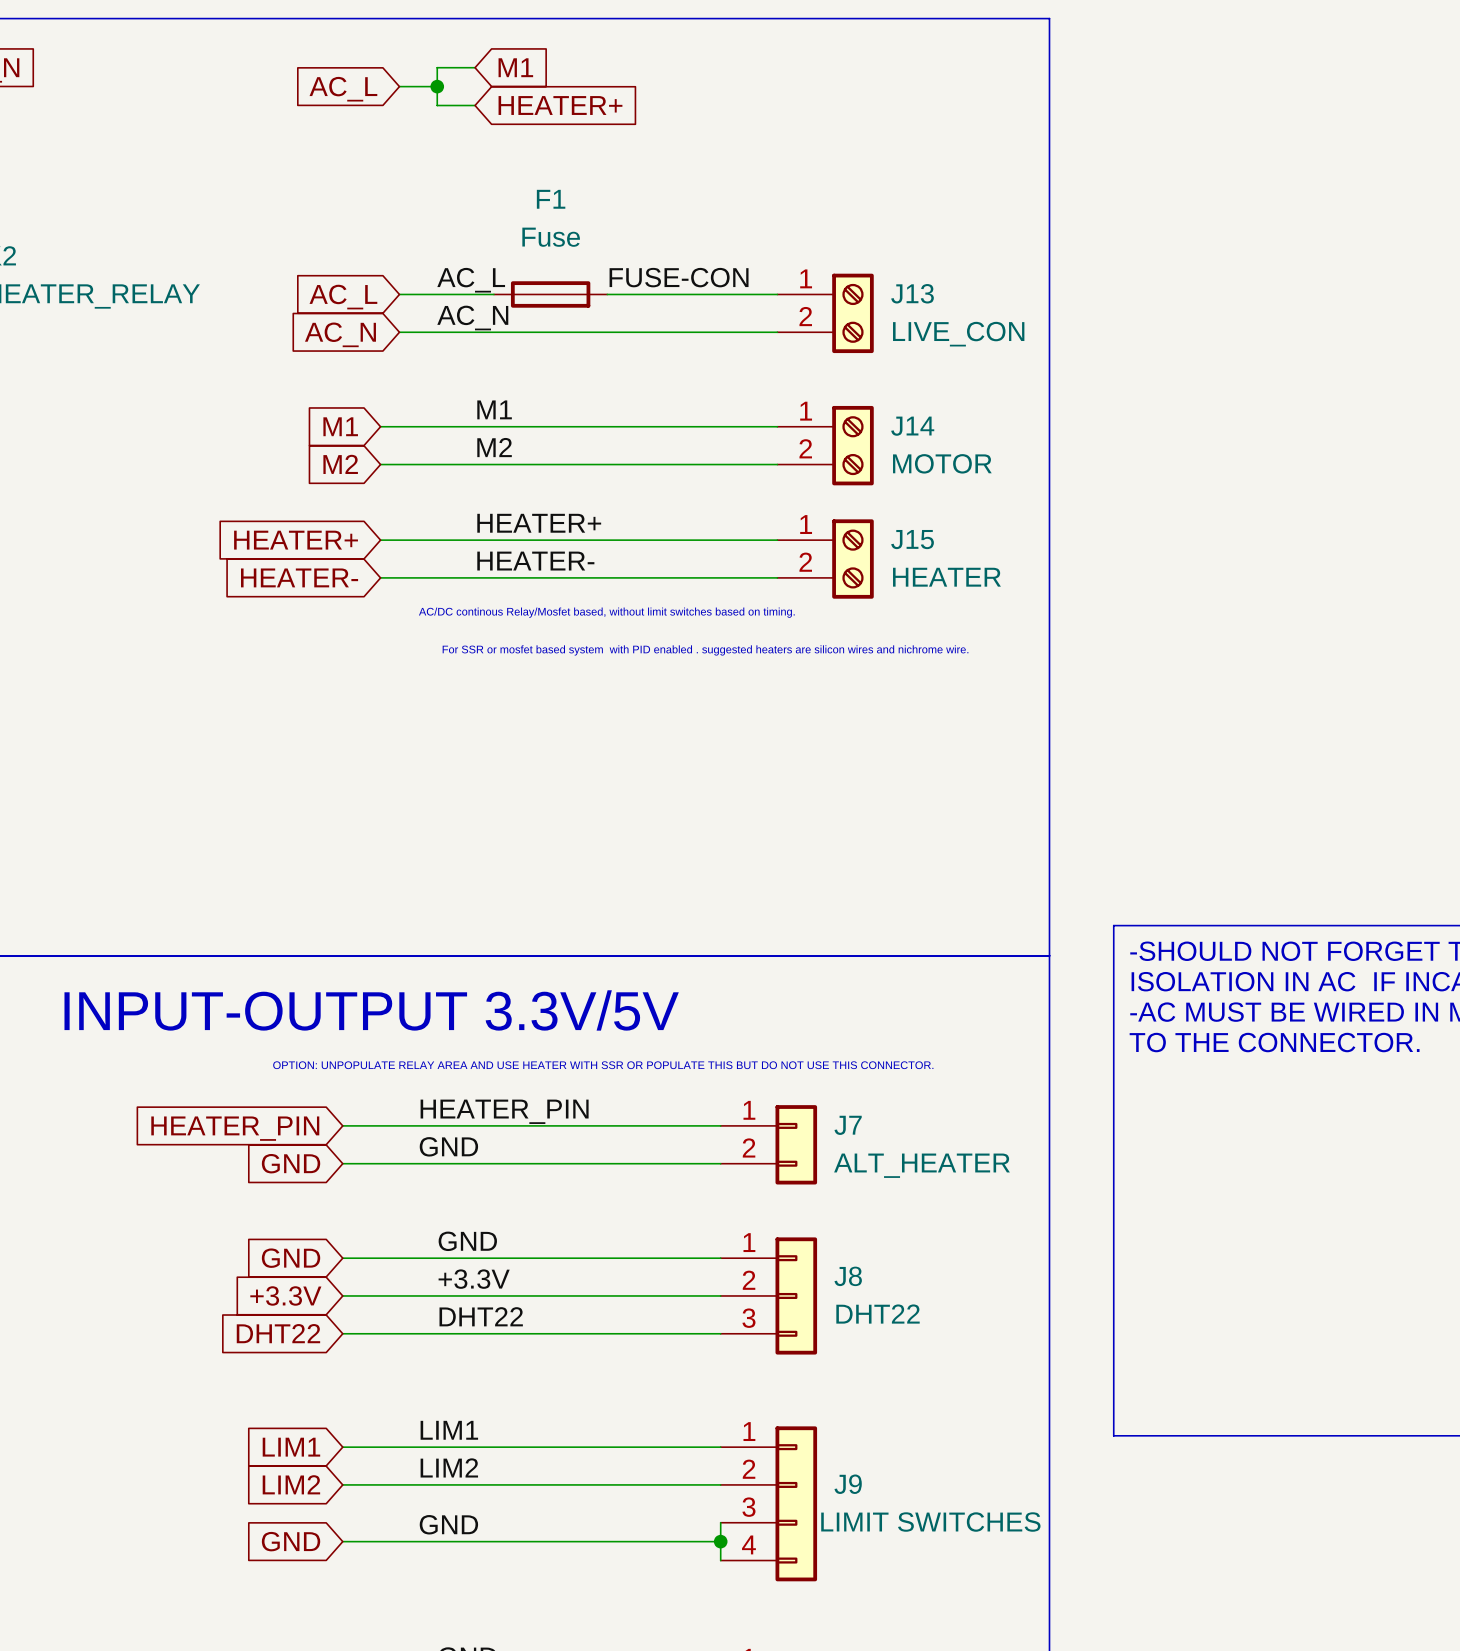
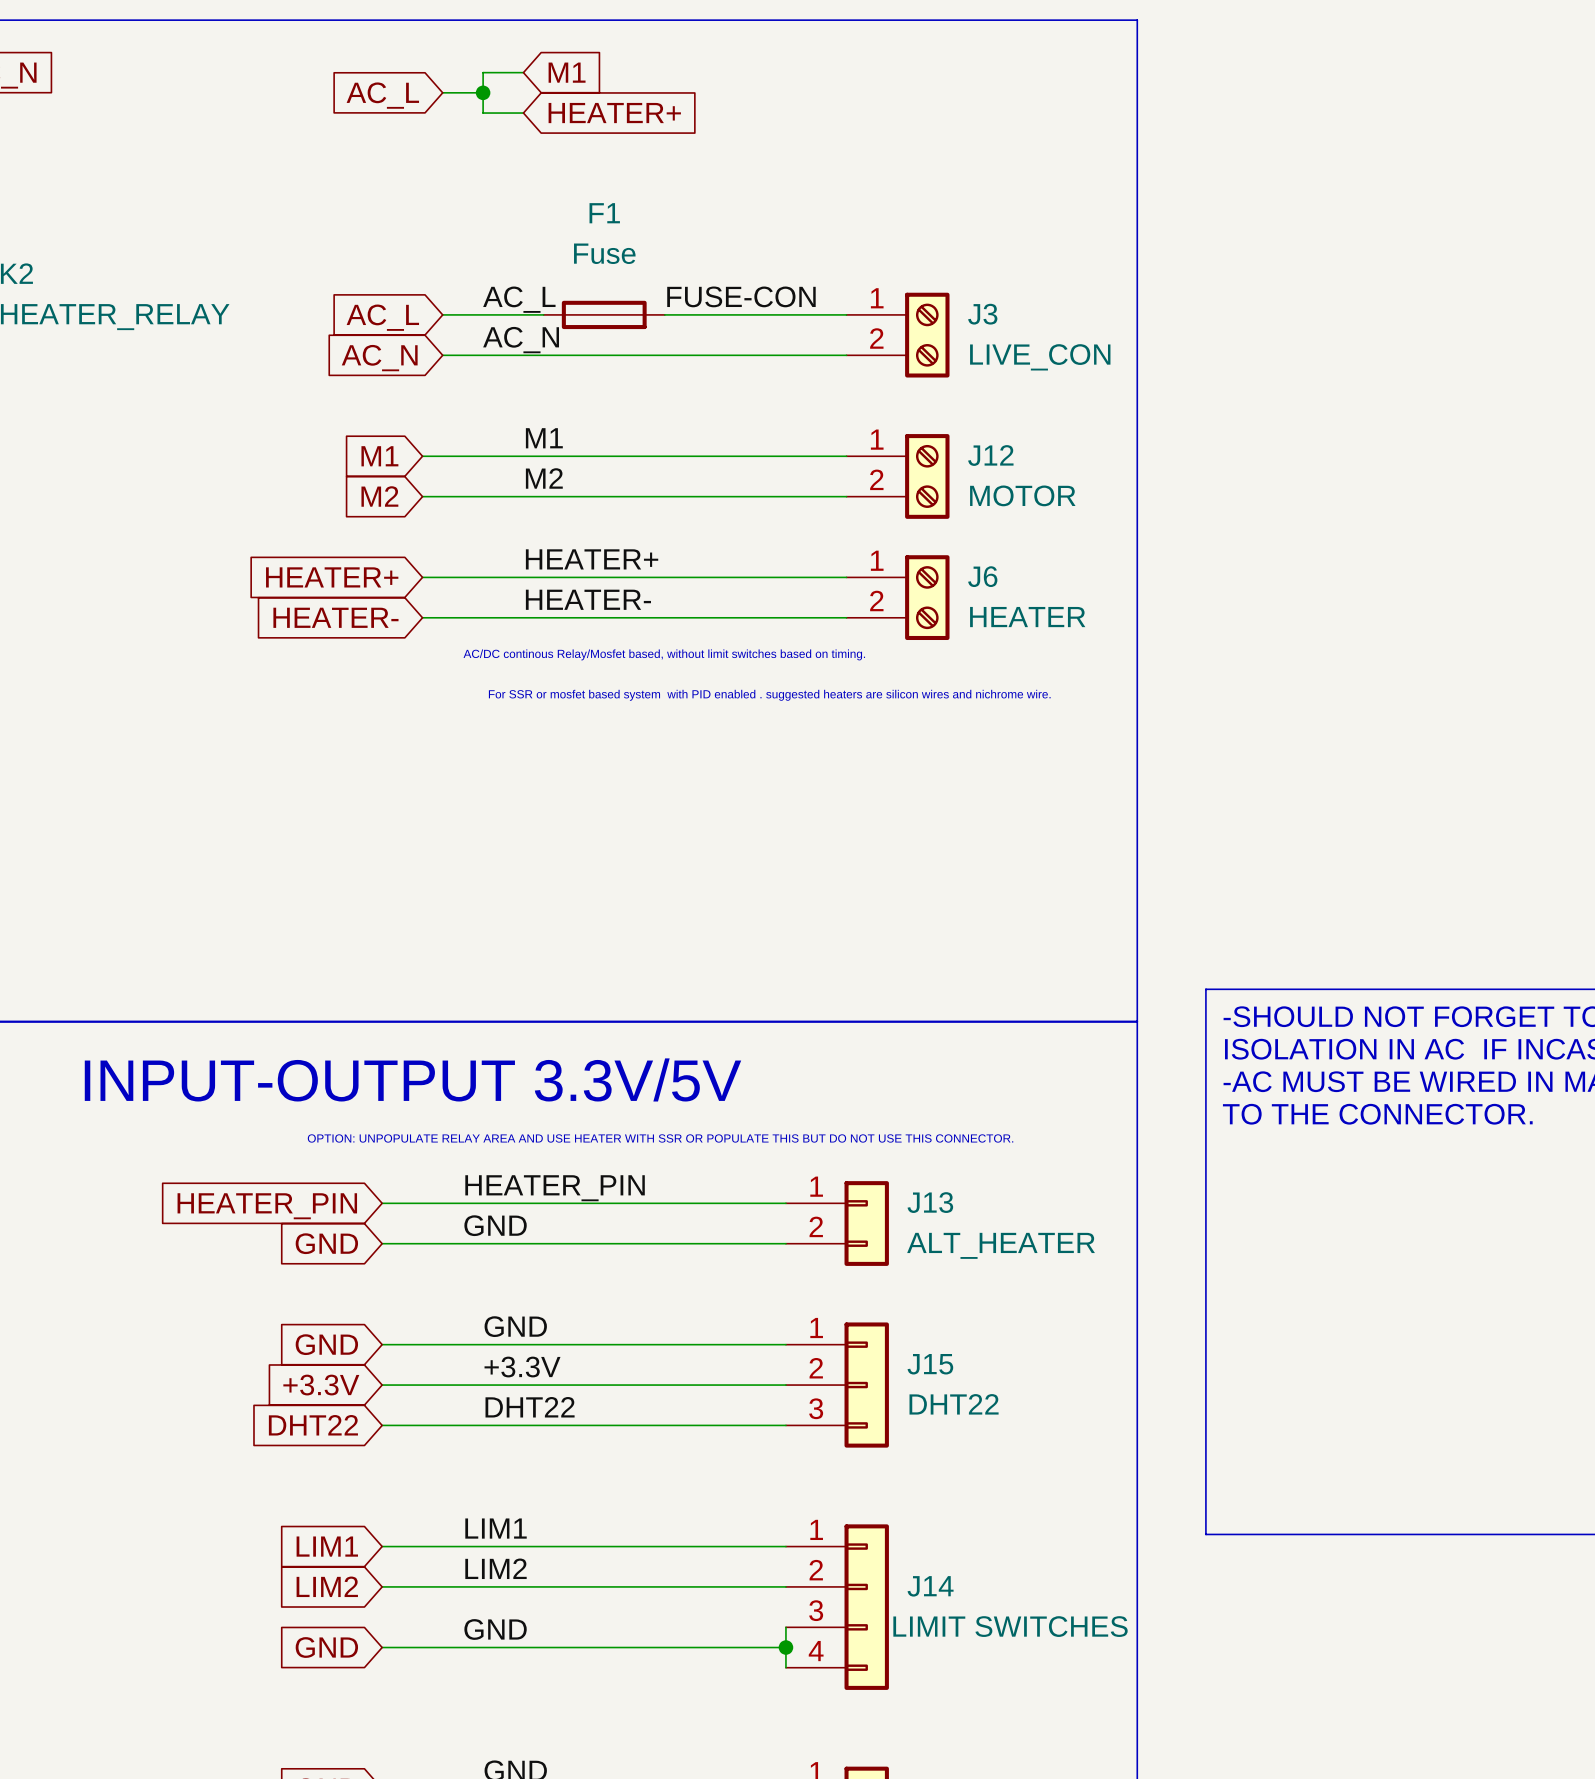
J13 name: J13 (912, 293) -> J3 (982, 314)
J14 name: J14 (912, 426) -> J12 (990, 455)
J15 name: J15 (912, 539) -> J6 (982, 576)
J7 name: J7 (848, 1125) -> J13 (930, 1202)
J8 name: J8 (848, 1276) -> J15 (930, 1364)
J9 name: J9 (848, 1484) -> J14 (930, 1586)

